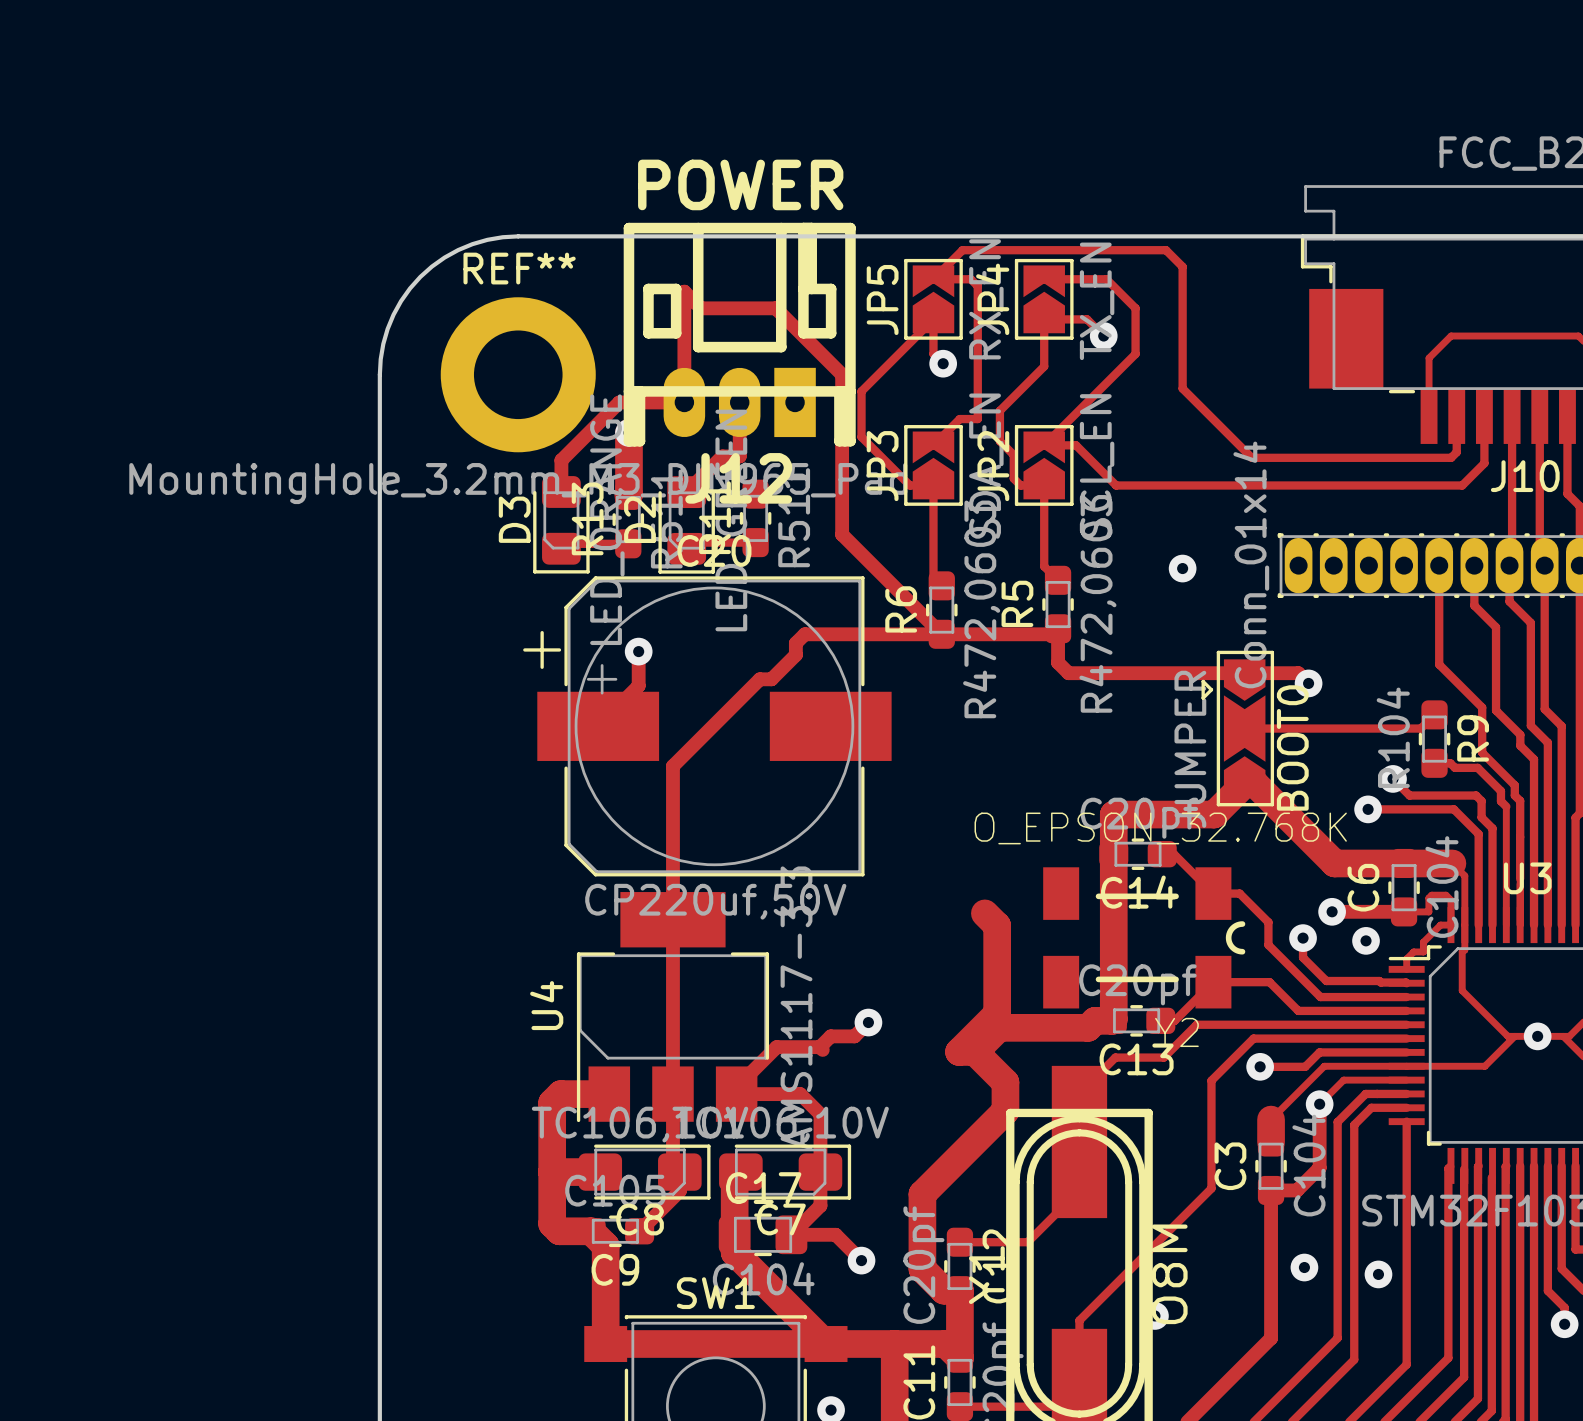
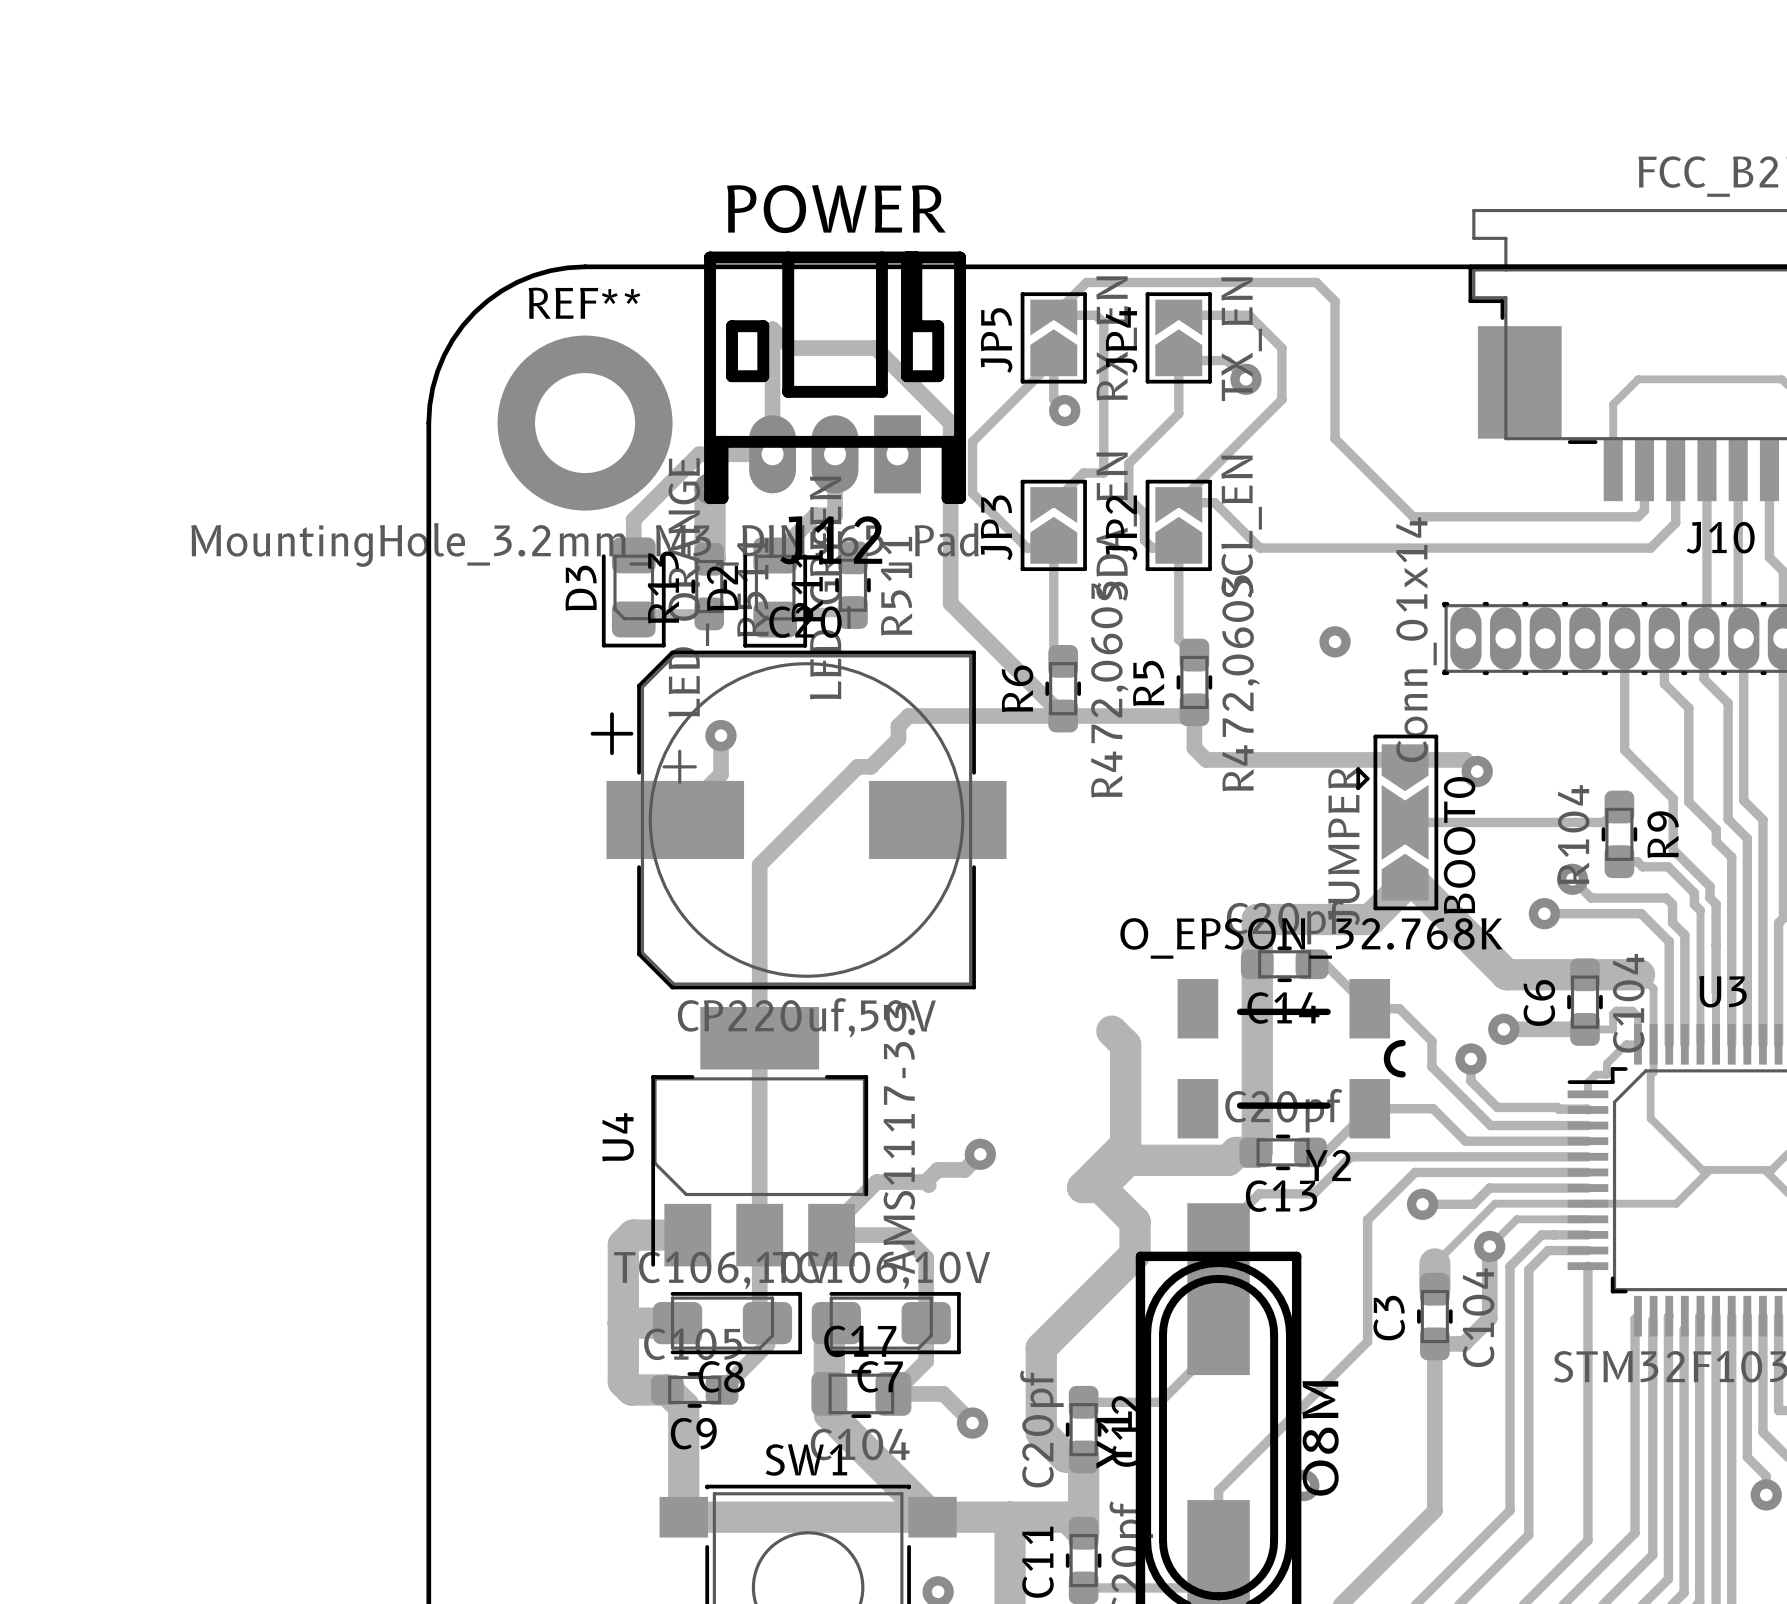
via: (1366, 940) -> none
via: (1537, 1036) -> none
via: (1304, 1267) -> none
via: (1378, 1274) -> none

